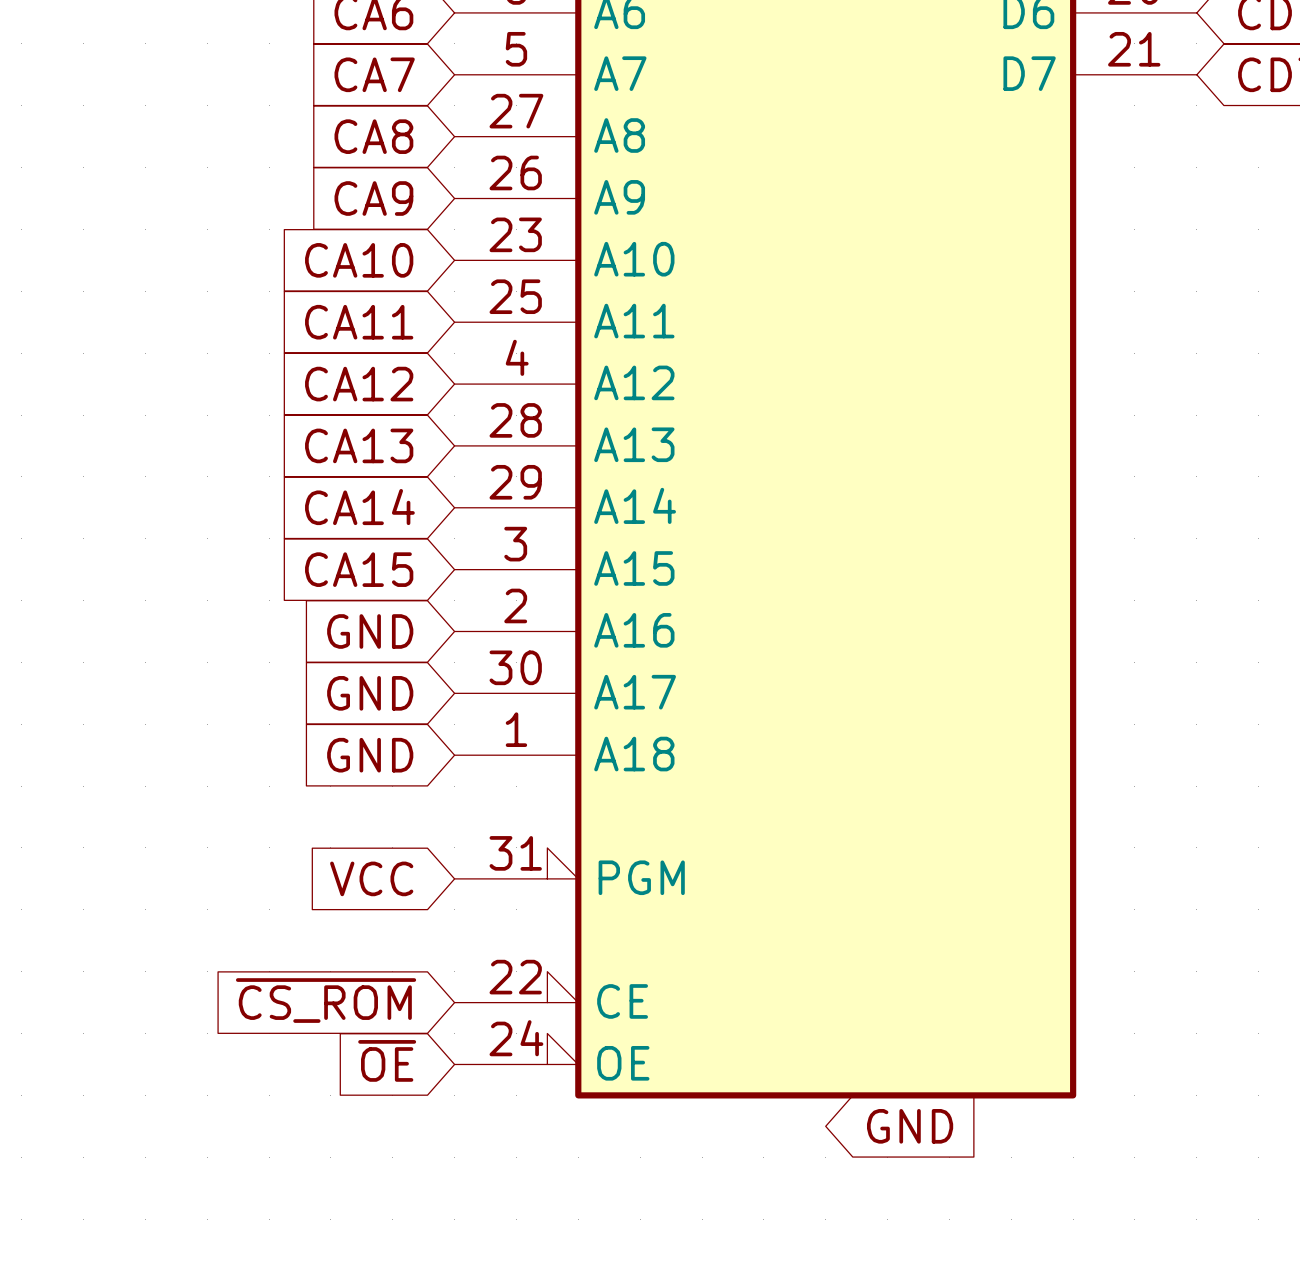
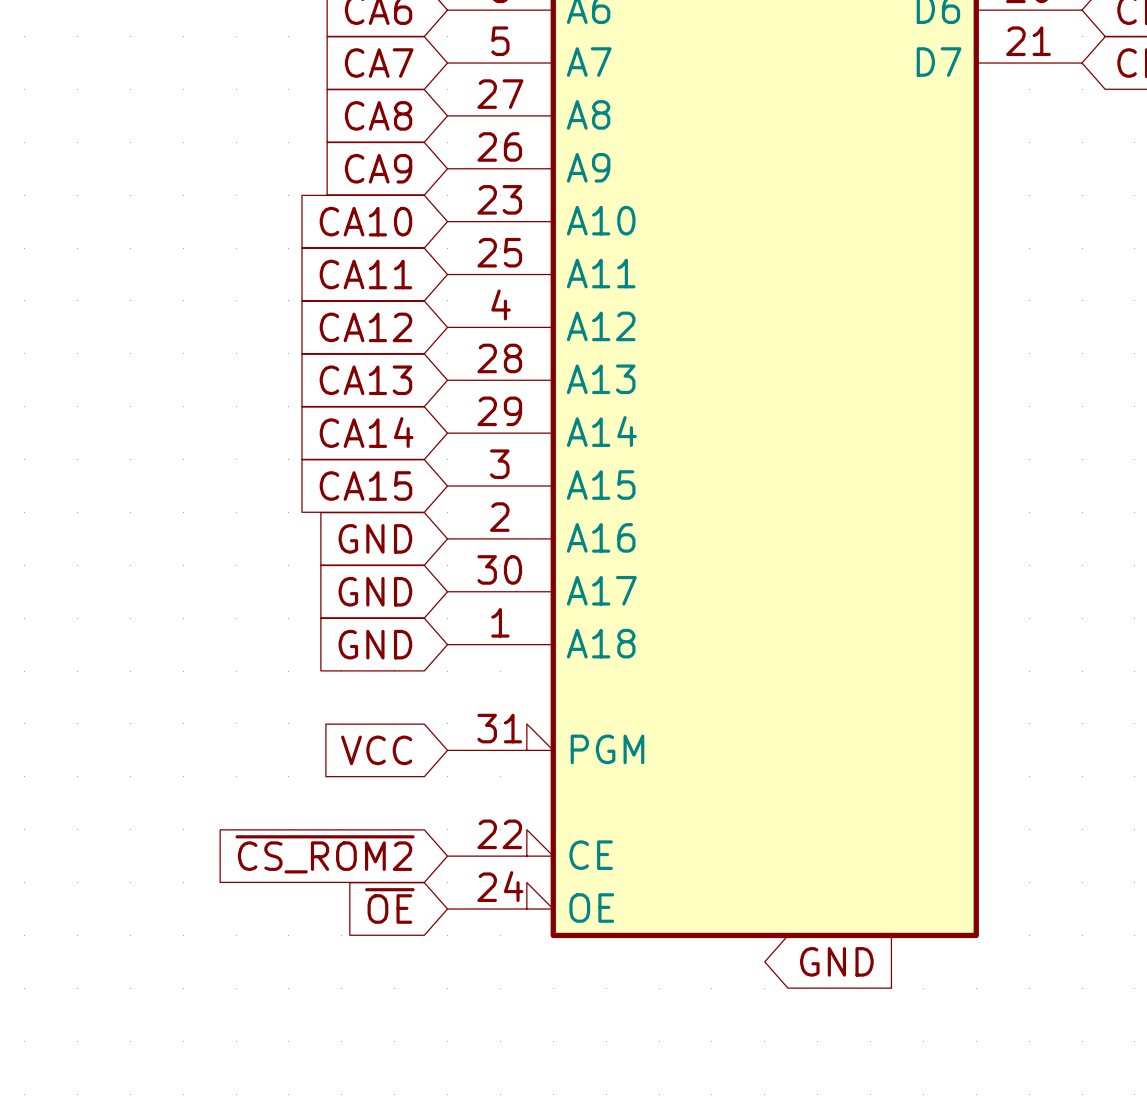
global label: ~{CS_ROM} (326, 1000) -> ~{CS_ROM2} (325, 854)

